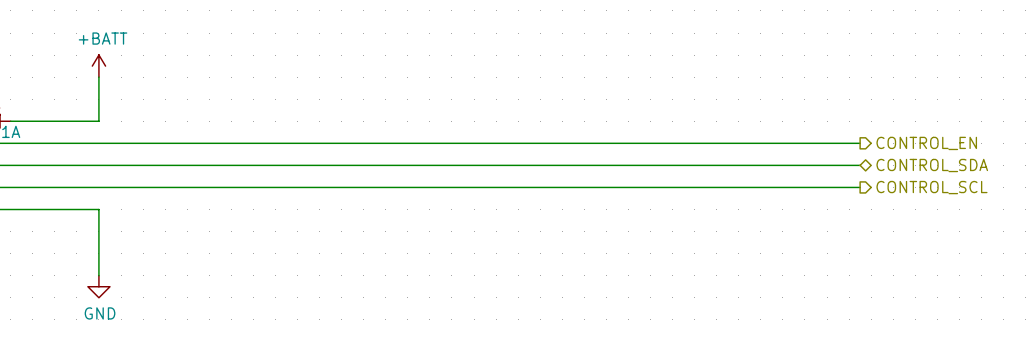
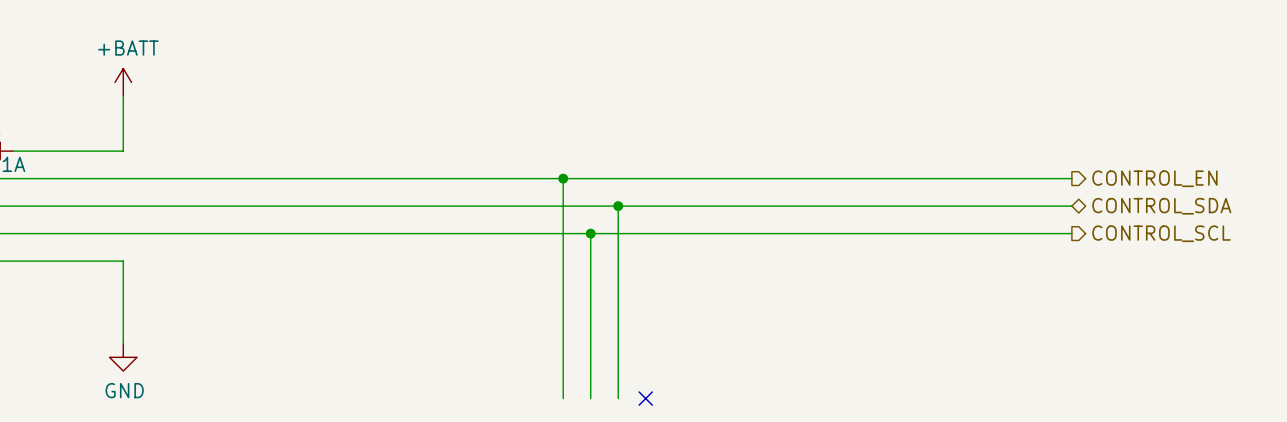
wire: none -> (563, 178) (563, 398)
junction: none -> (563, 178)
wire: none -> (618, 206) (618, 398)
junction: none -> (618, 206)
wire: none -> (590, 233) (590, 398)
junction: none -> (590, 233)
no-connect mark: none -> (645, 398)

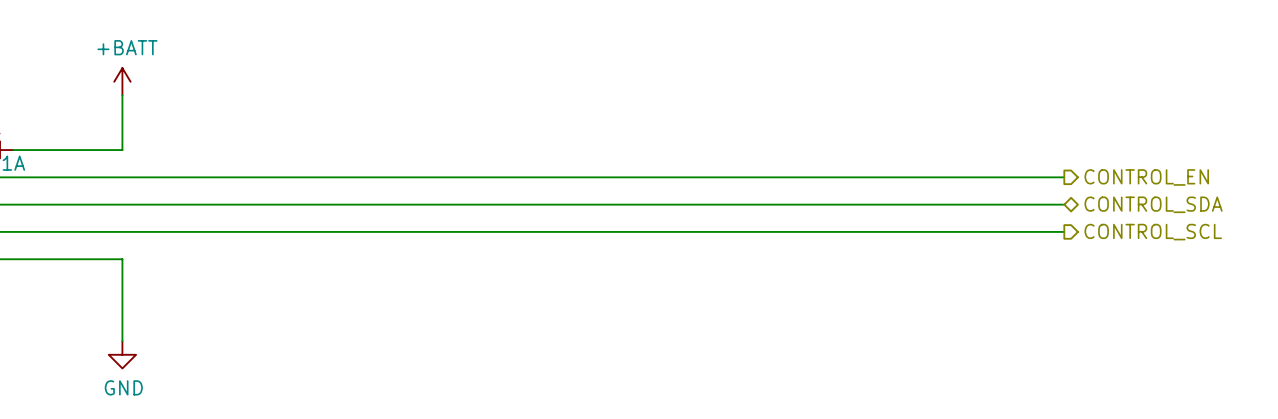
wire: (563, 178) (563, 398) -> none
junction: (563, 178) -> none
wire: (618, 206) (618, 398) -> none
junction: (618, 206) -> none
wire: (590, 233) (590, 398) -> none
junction: (590, 233) -> none
no-connect mark: (645, 398) -> none

